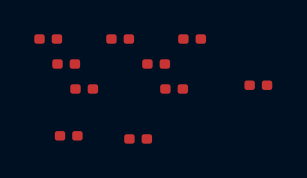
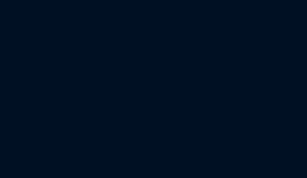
part: (48, 39) -> none
part: (120, 39) -> none
part: (192, 39) -> none
part: (66, 63) -> none
part: (156, 63) -> none
part: (258, 85) -> none
part: (84, 88) -> none
part: (174, 88) -> none
part: (68, 135) -> none
part: (138, 138) -> none

